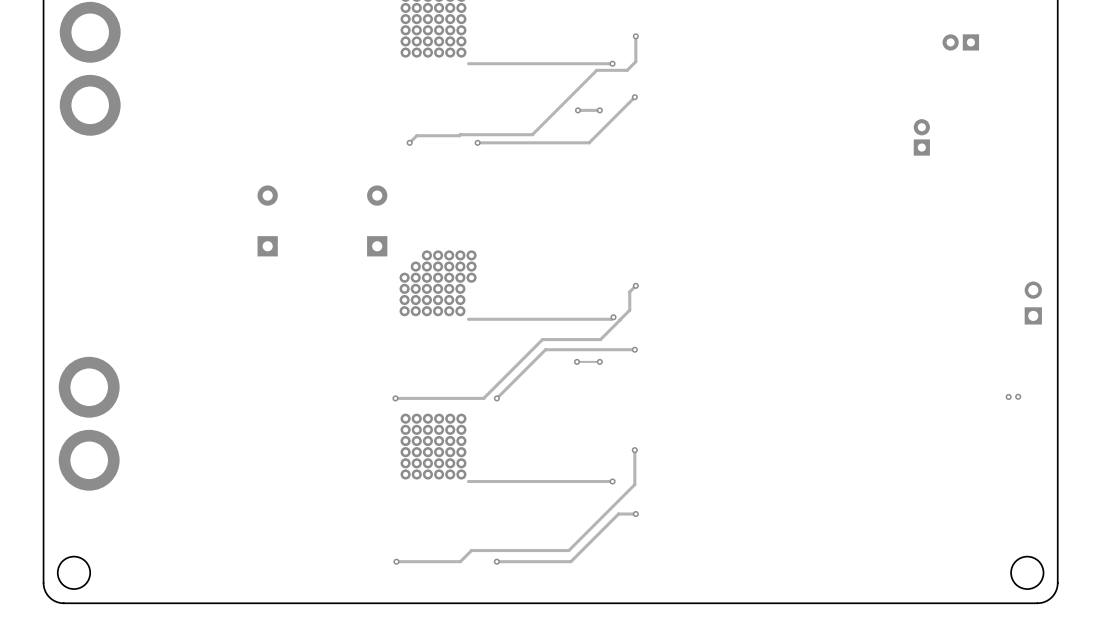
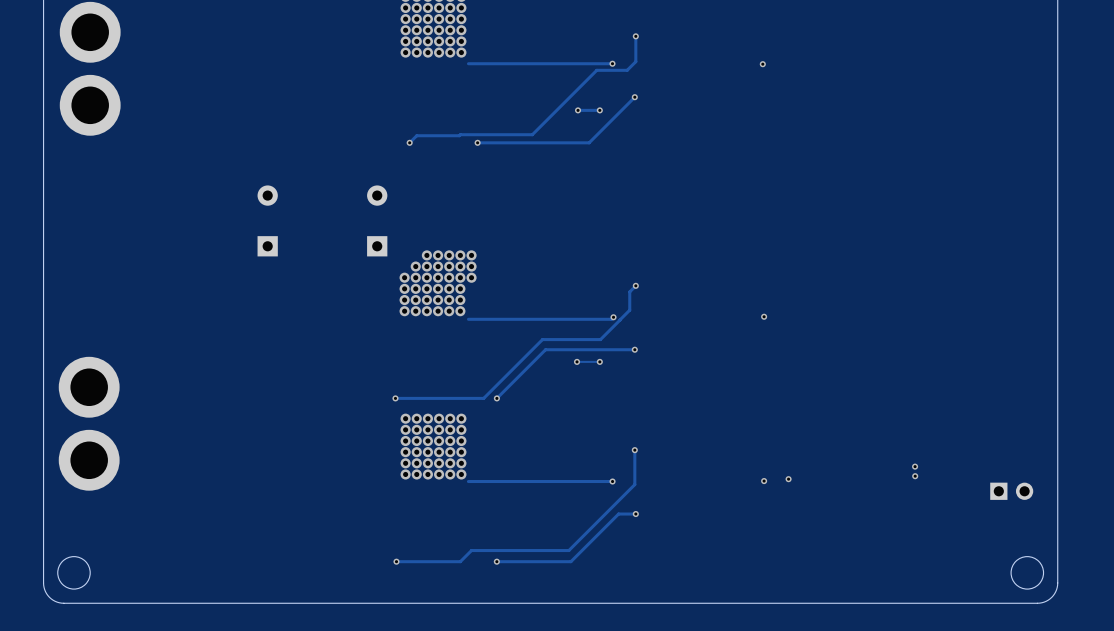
part: (960, 42) -> none
via: none -> (762, 64)
part: (921, 137) -> none
part rotation: 0° (1033, 303) -> 90° clockwise (1011, 491)
part position: (1033, 303) -> (1011, 491)
via: none -> (764, 316)
via: (1008, 396) -> none
via: (1018, 396) -> none
via: none -> (915, 466)
via: none -> (915, 476)
via: none -> (788, 479)
via: none -> (764, 481)

